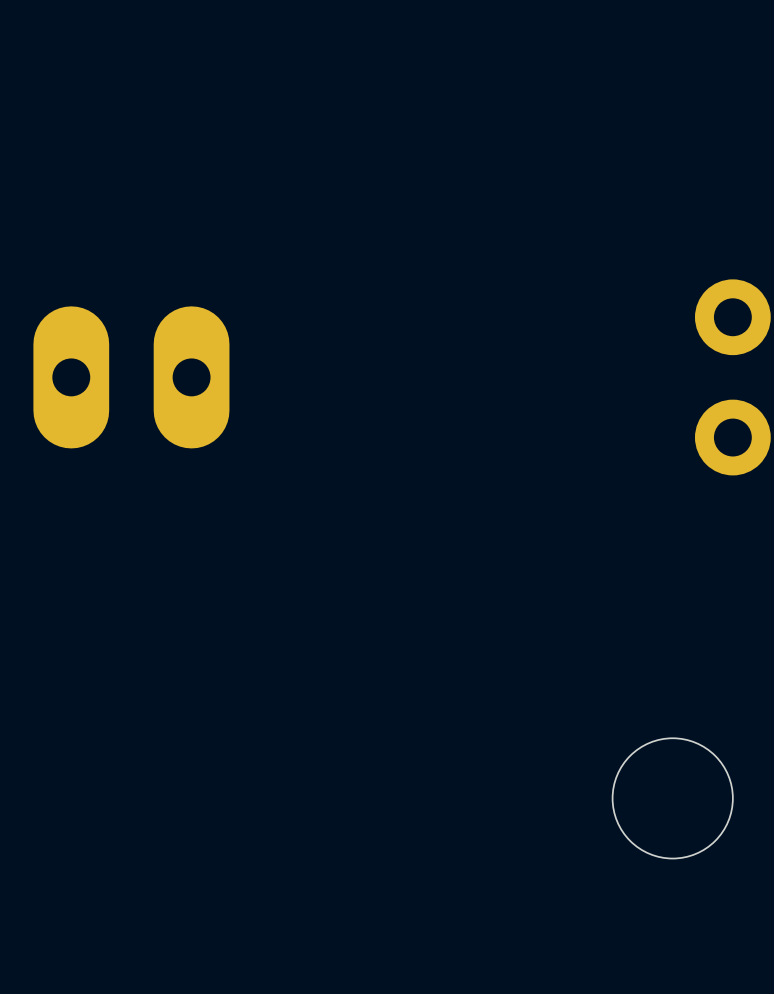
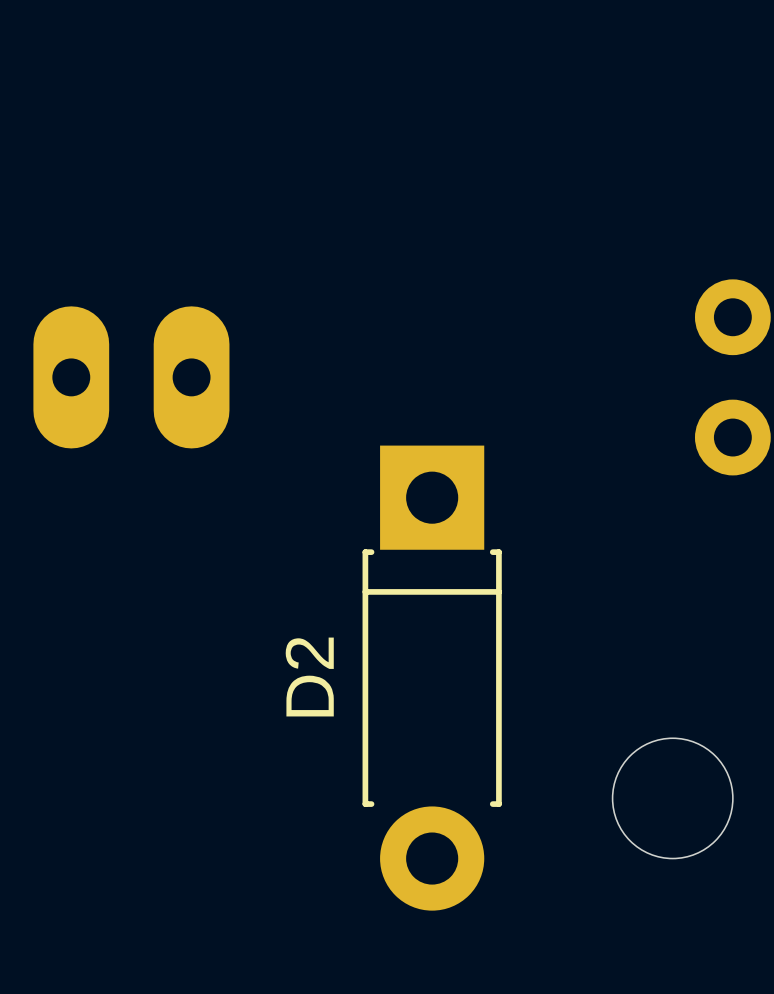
D2: none -> (432, 678)

